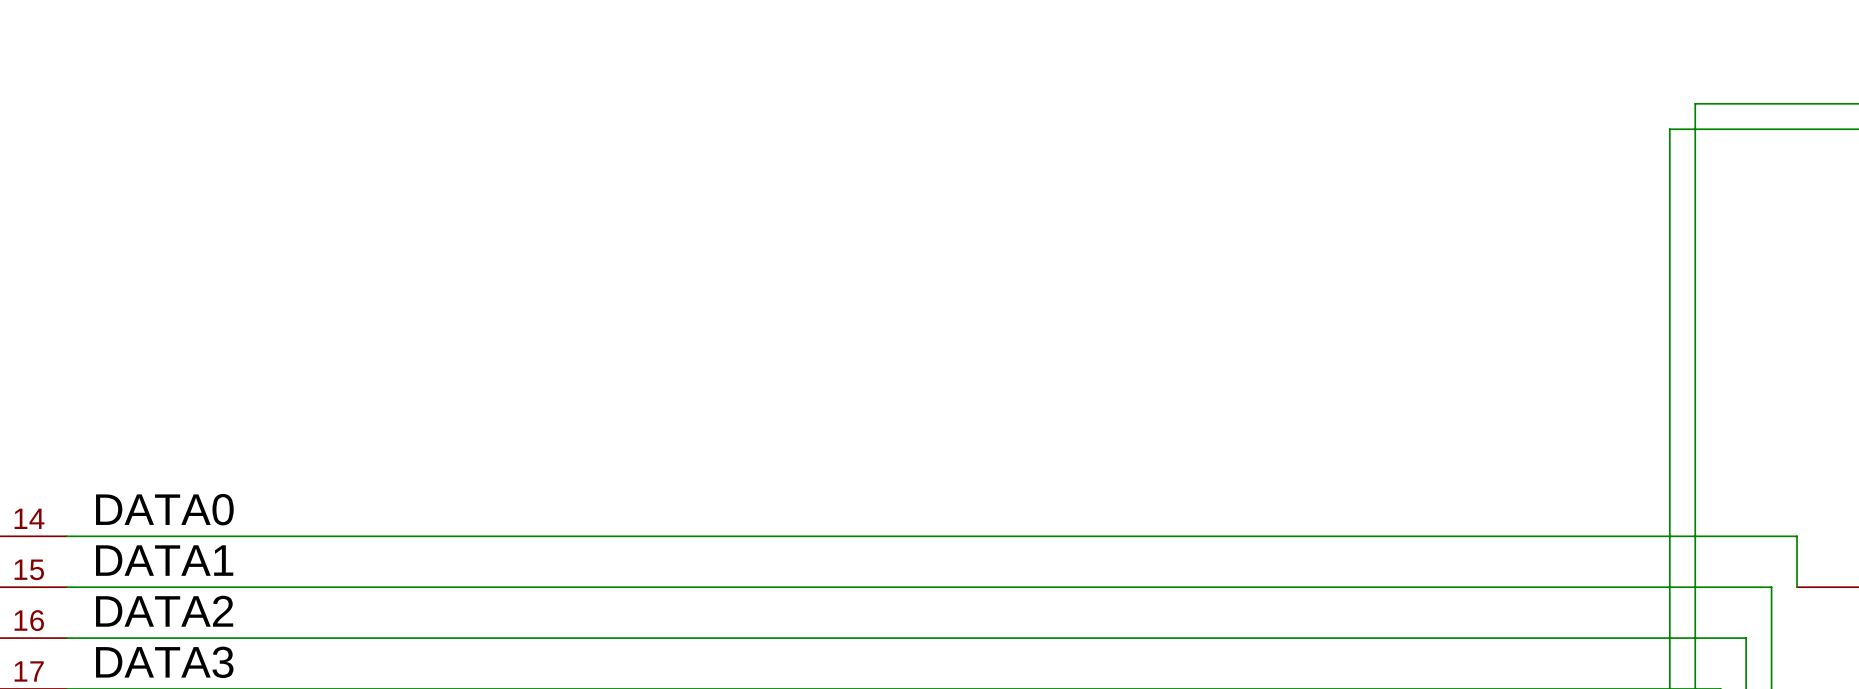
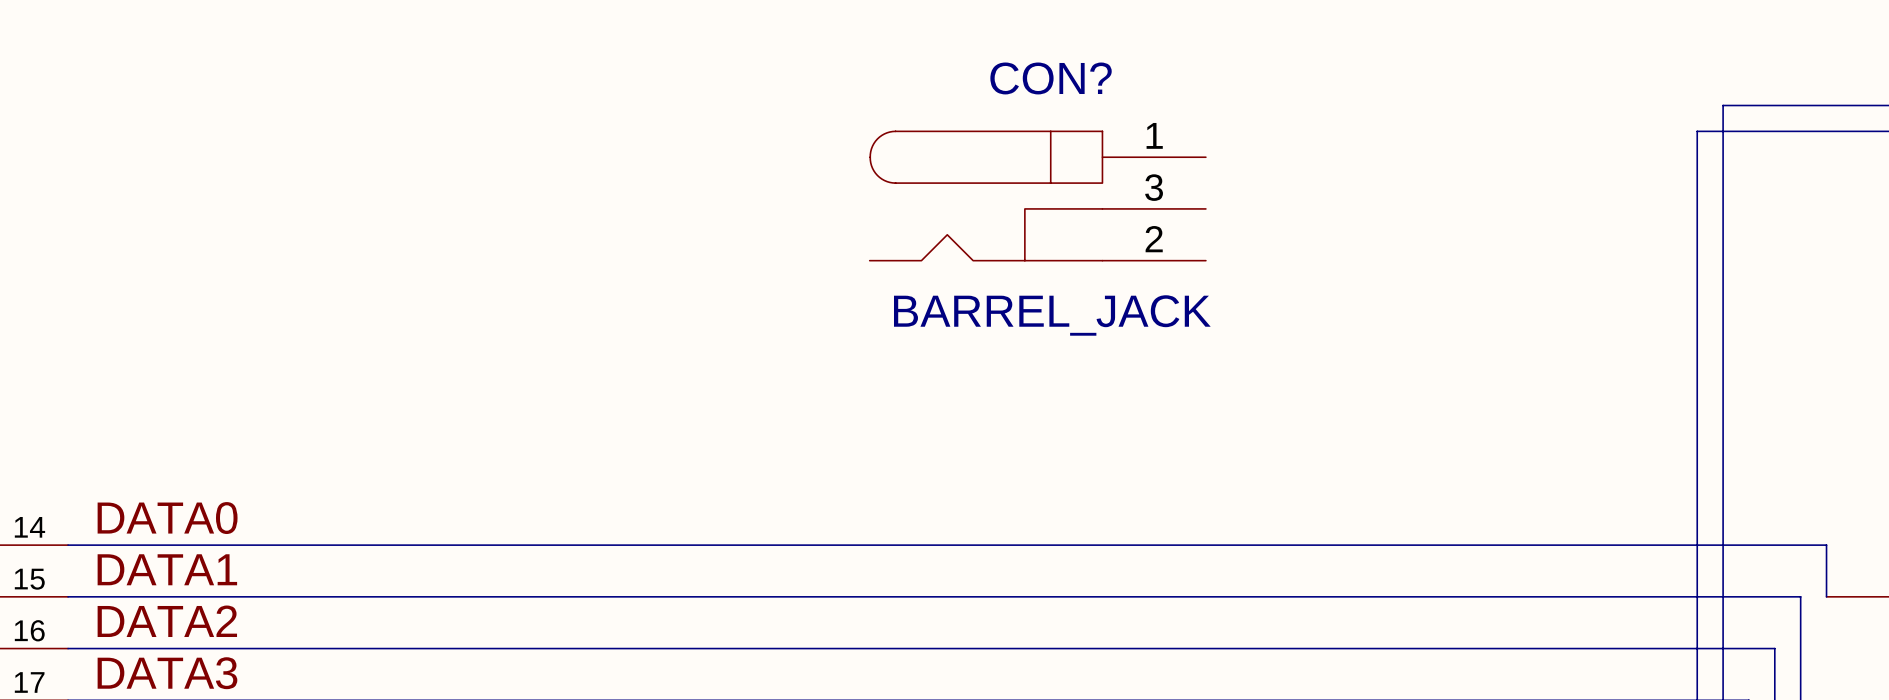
CON?: none -> BARREL_JACK (1037, 196)

